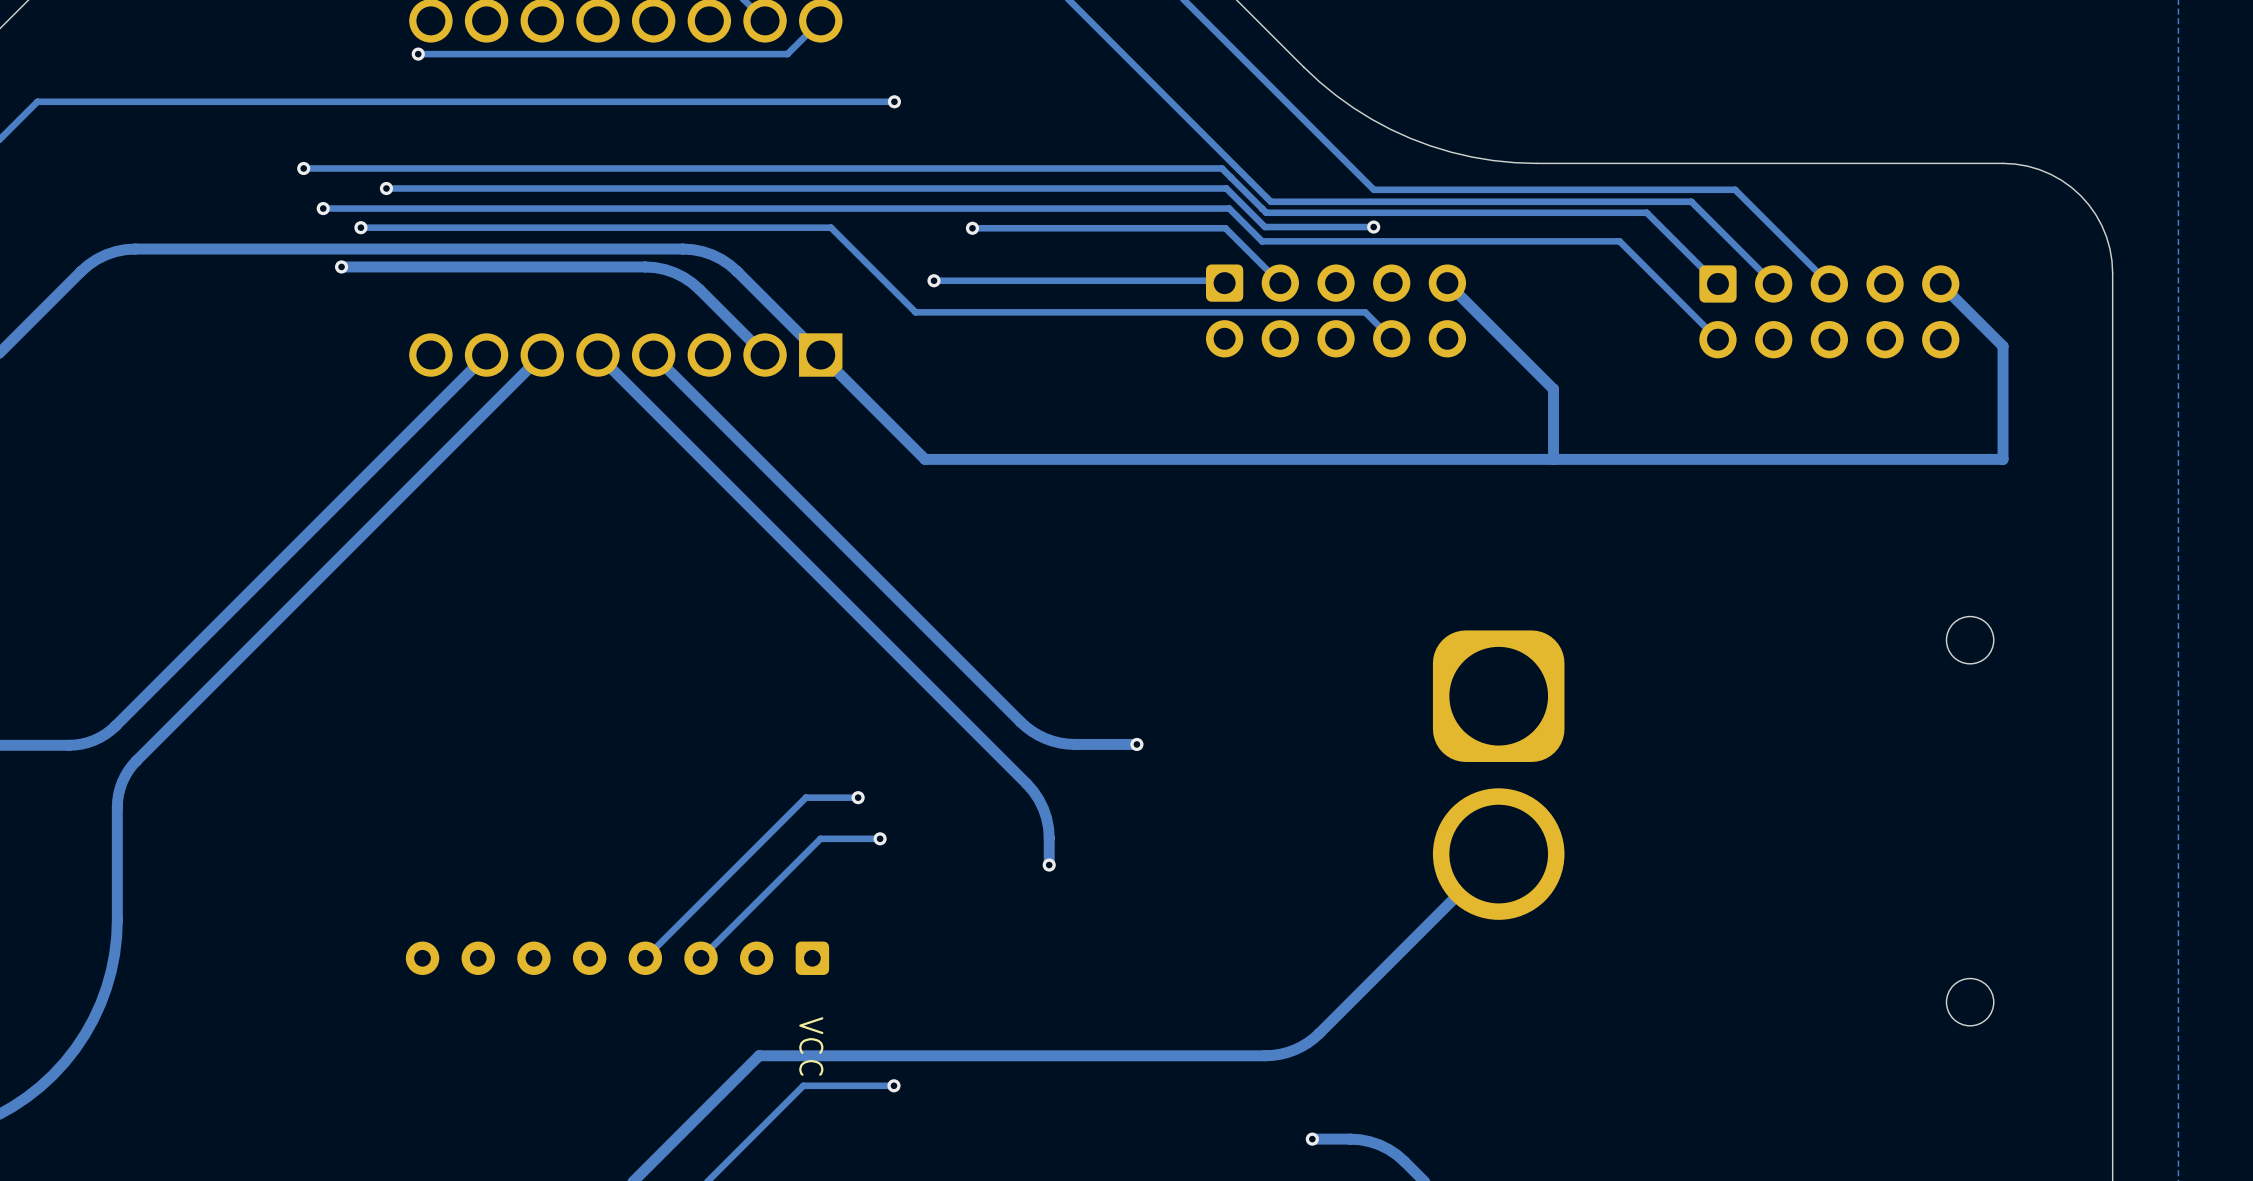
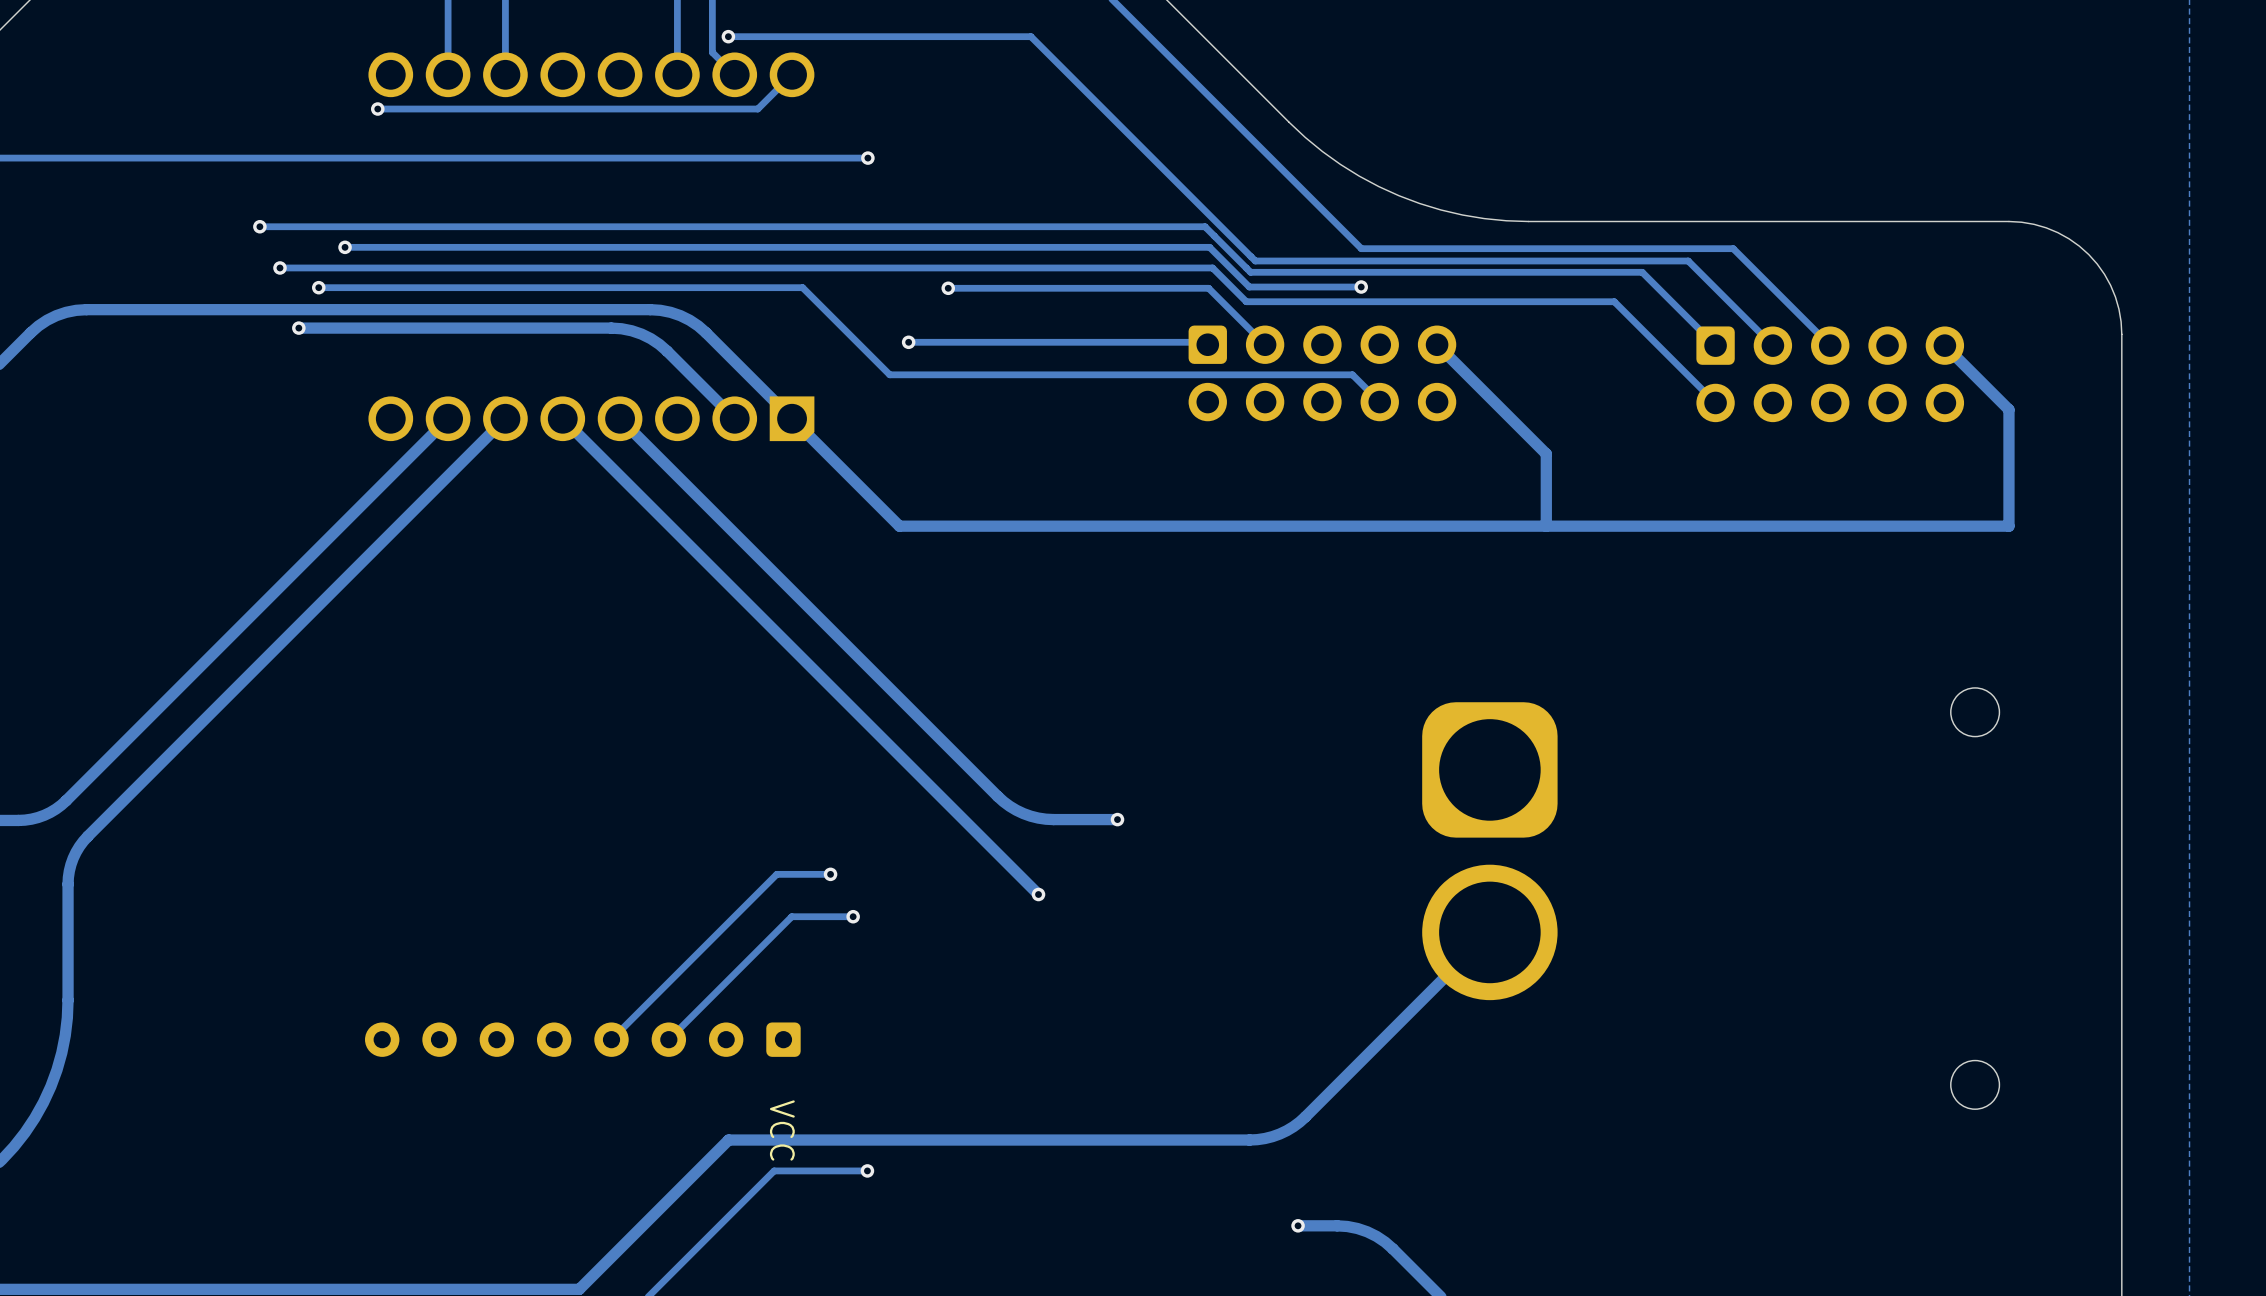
track: (1026, 783) (1038, 799) (1046, 818) (1049, 838) (1049, 865) -> (1004, 860) (1038, 894)
via position: (1049, 865) -> (1038, 894)

